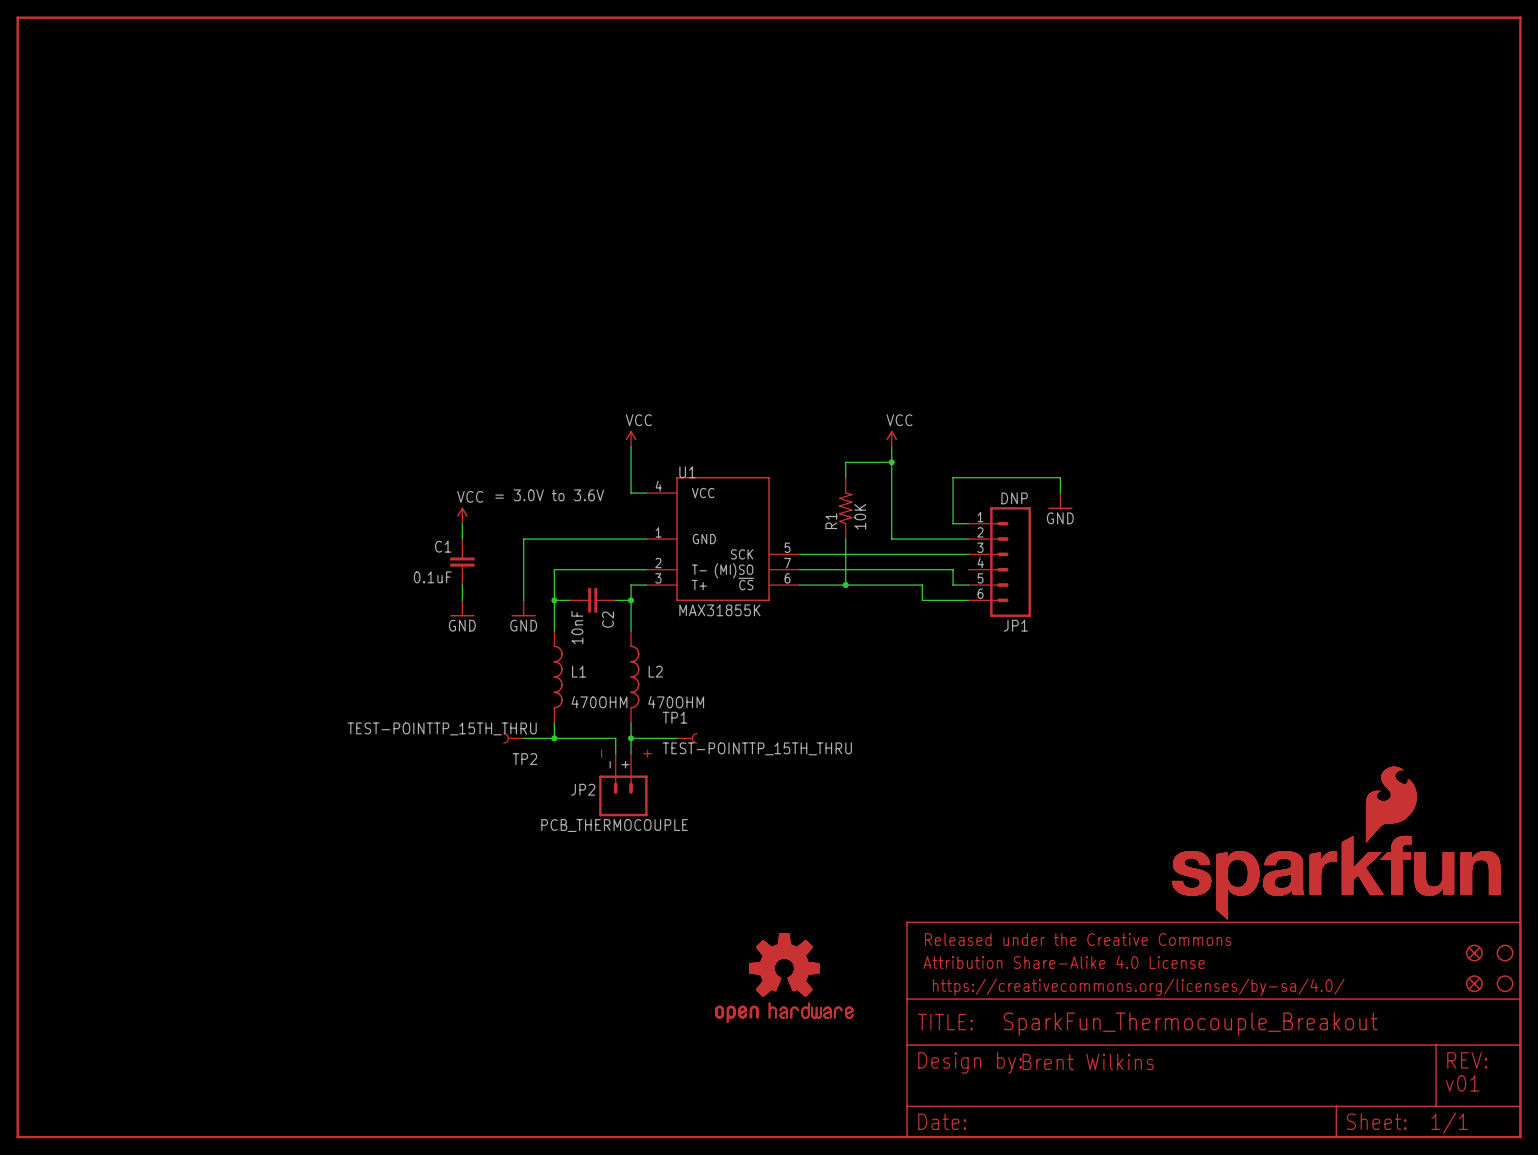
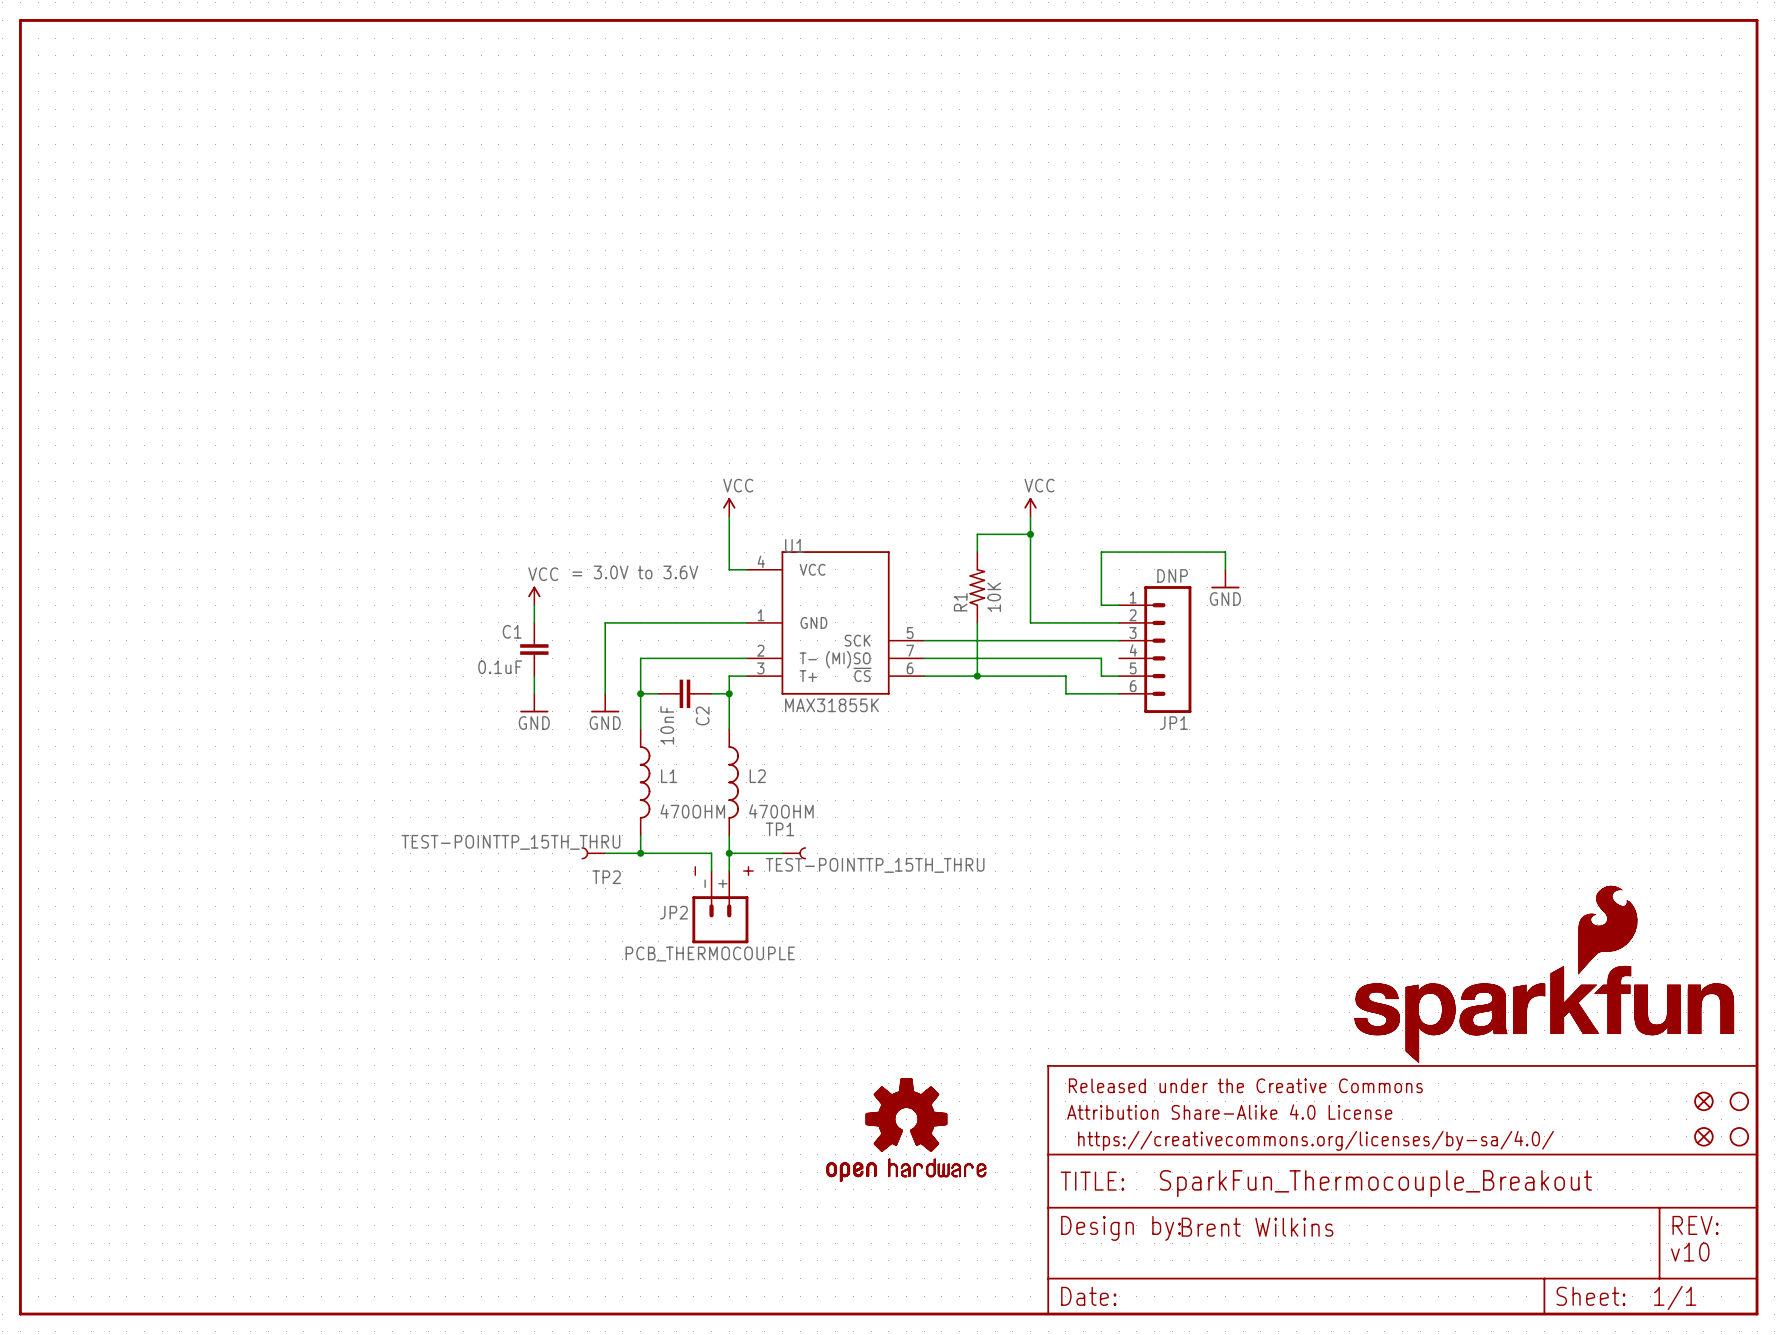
text: v01 (1462, 1083) -> v10 (1690, 1252)

